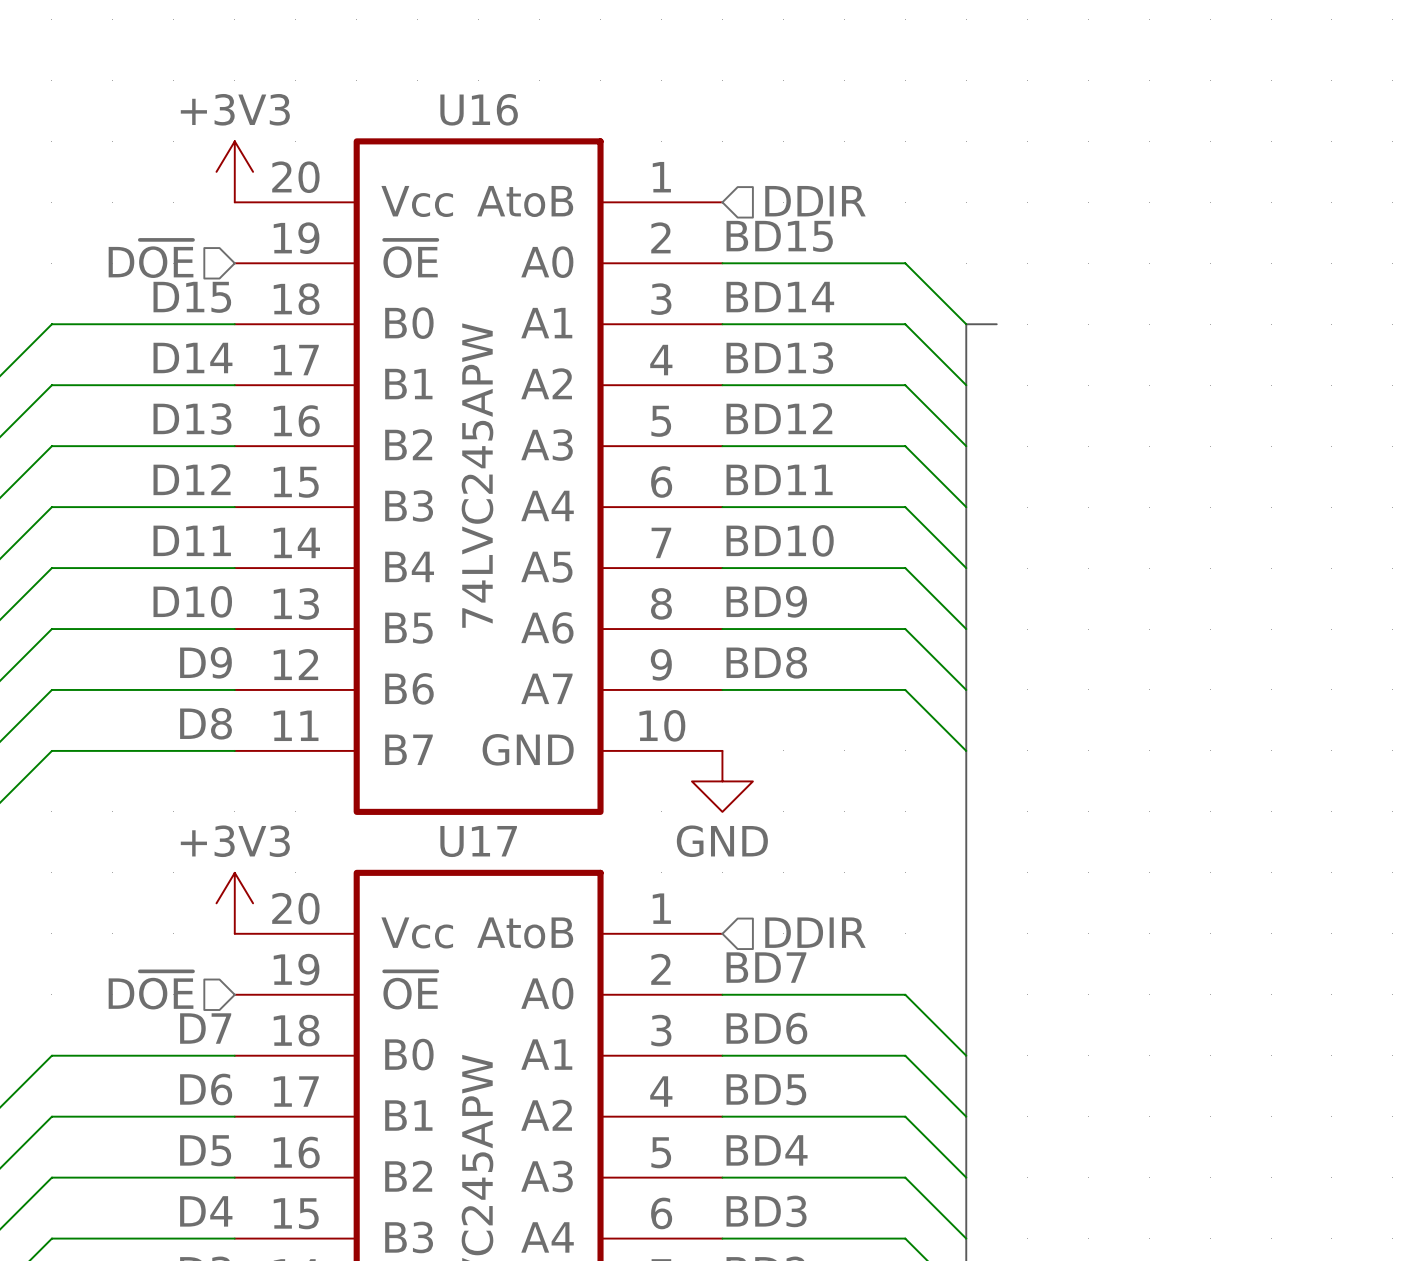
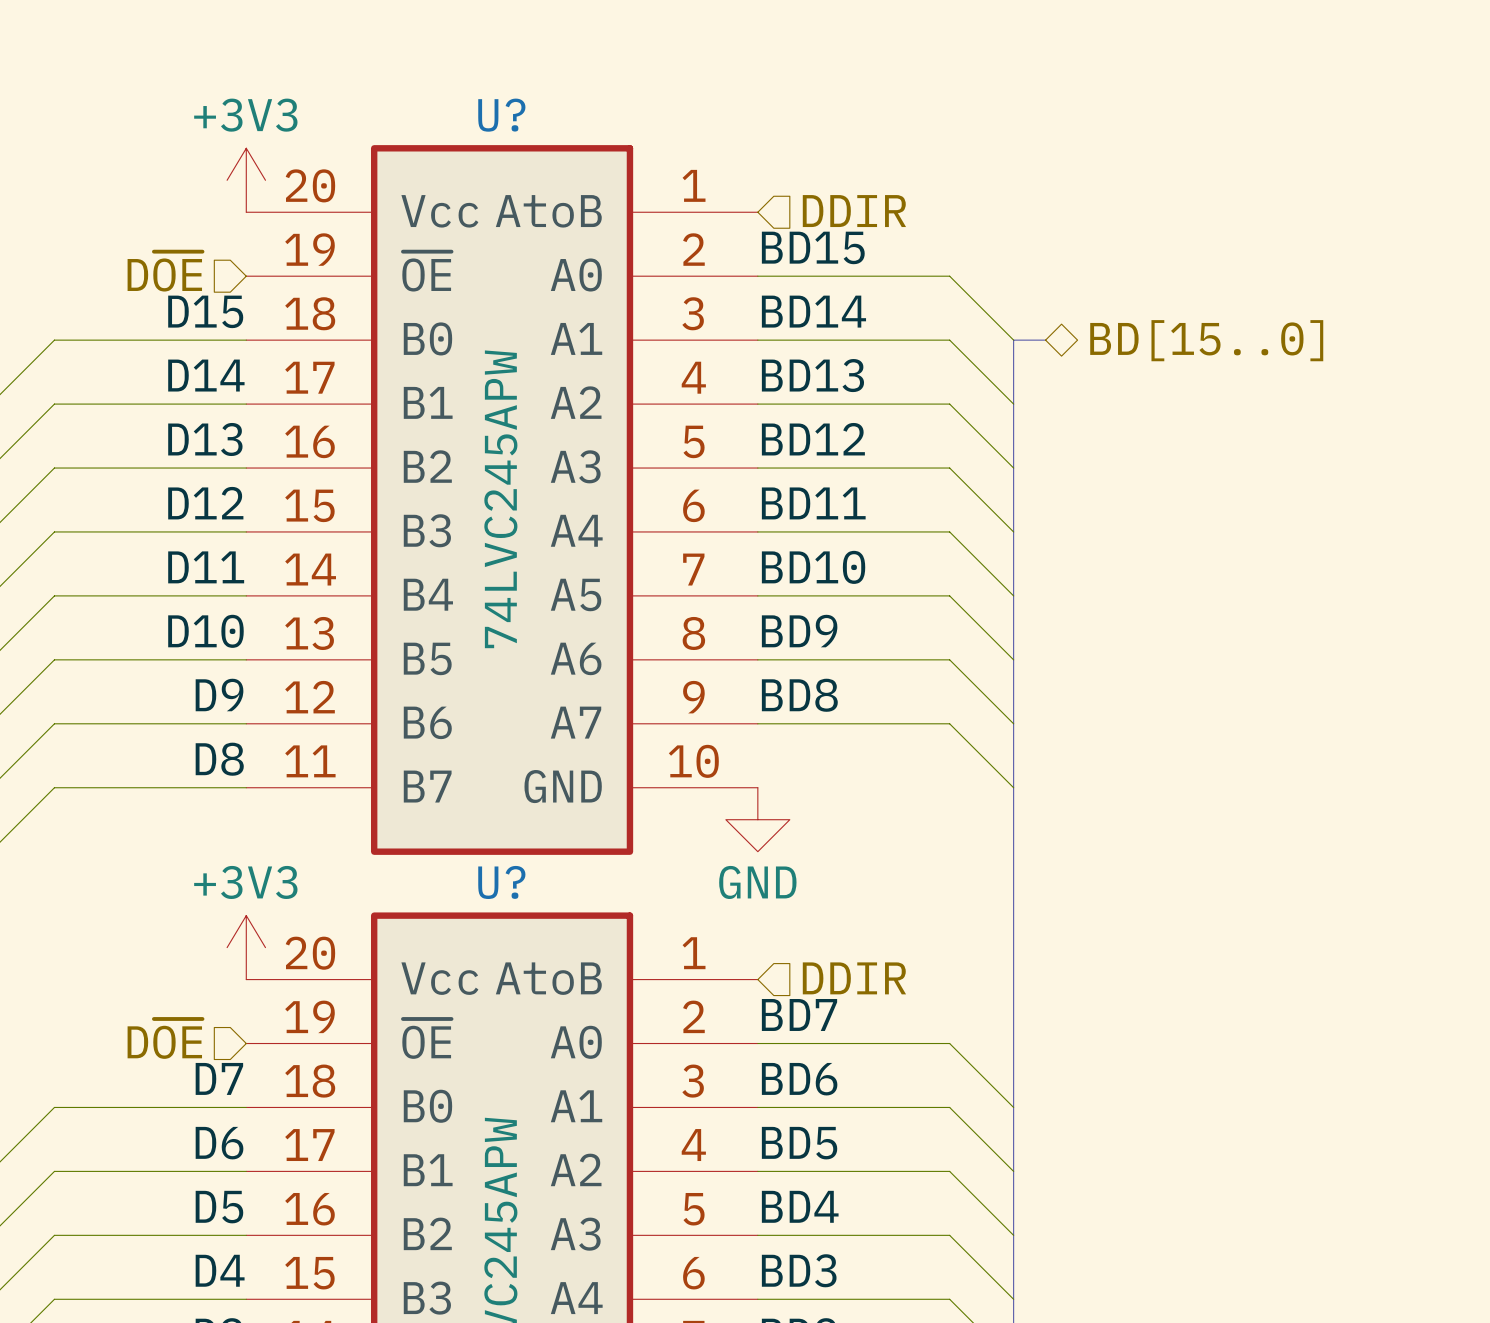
U16 name: U16 (479, 109) -> U? (501, 115)
hierarchical label: none -> BD[15..0] (1206, 340)
U17 name: U17 (478, 841) -> U? (501, 882)

